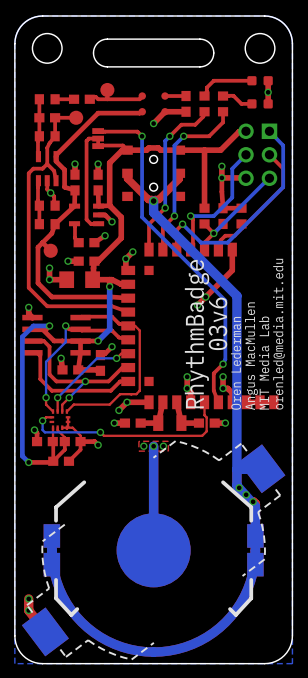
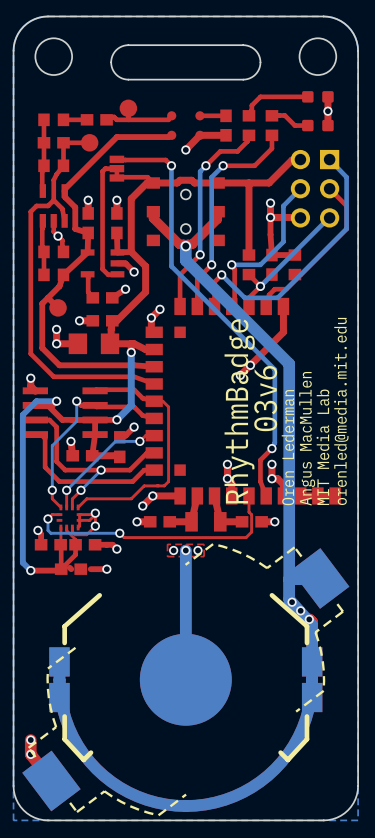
via: none -> (95, 513)
top track: none -> (93, 514) (89, 520) (79, 520)
top track: none -> (93, 514) (79, 514)
via: none -> (95, 526)
top track: (62, 427) (72, 427) (80, 435) (80, 449) (68, 461) -> (72, 527) (72, 531) (75, 534) (86, 534) (95, 526) (95, 513) (93, 514)
top track: none -> (69, 567) (71, 569)
top track: none -> (106, 569) (90, 569)
via: none -> (106, 569)

